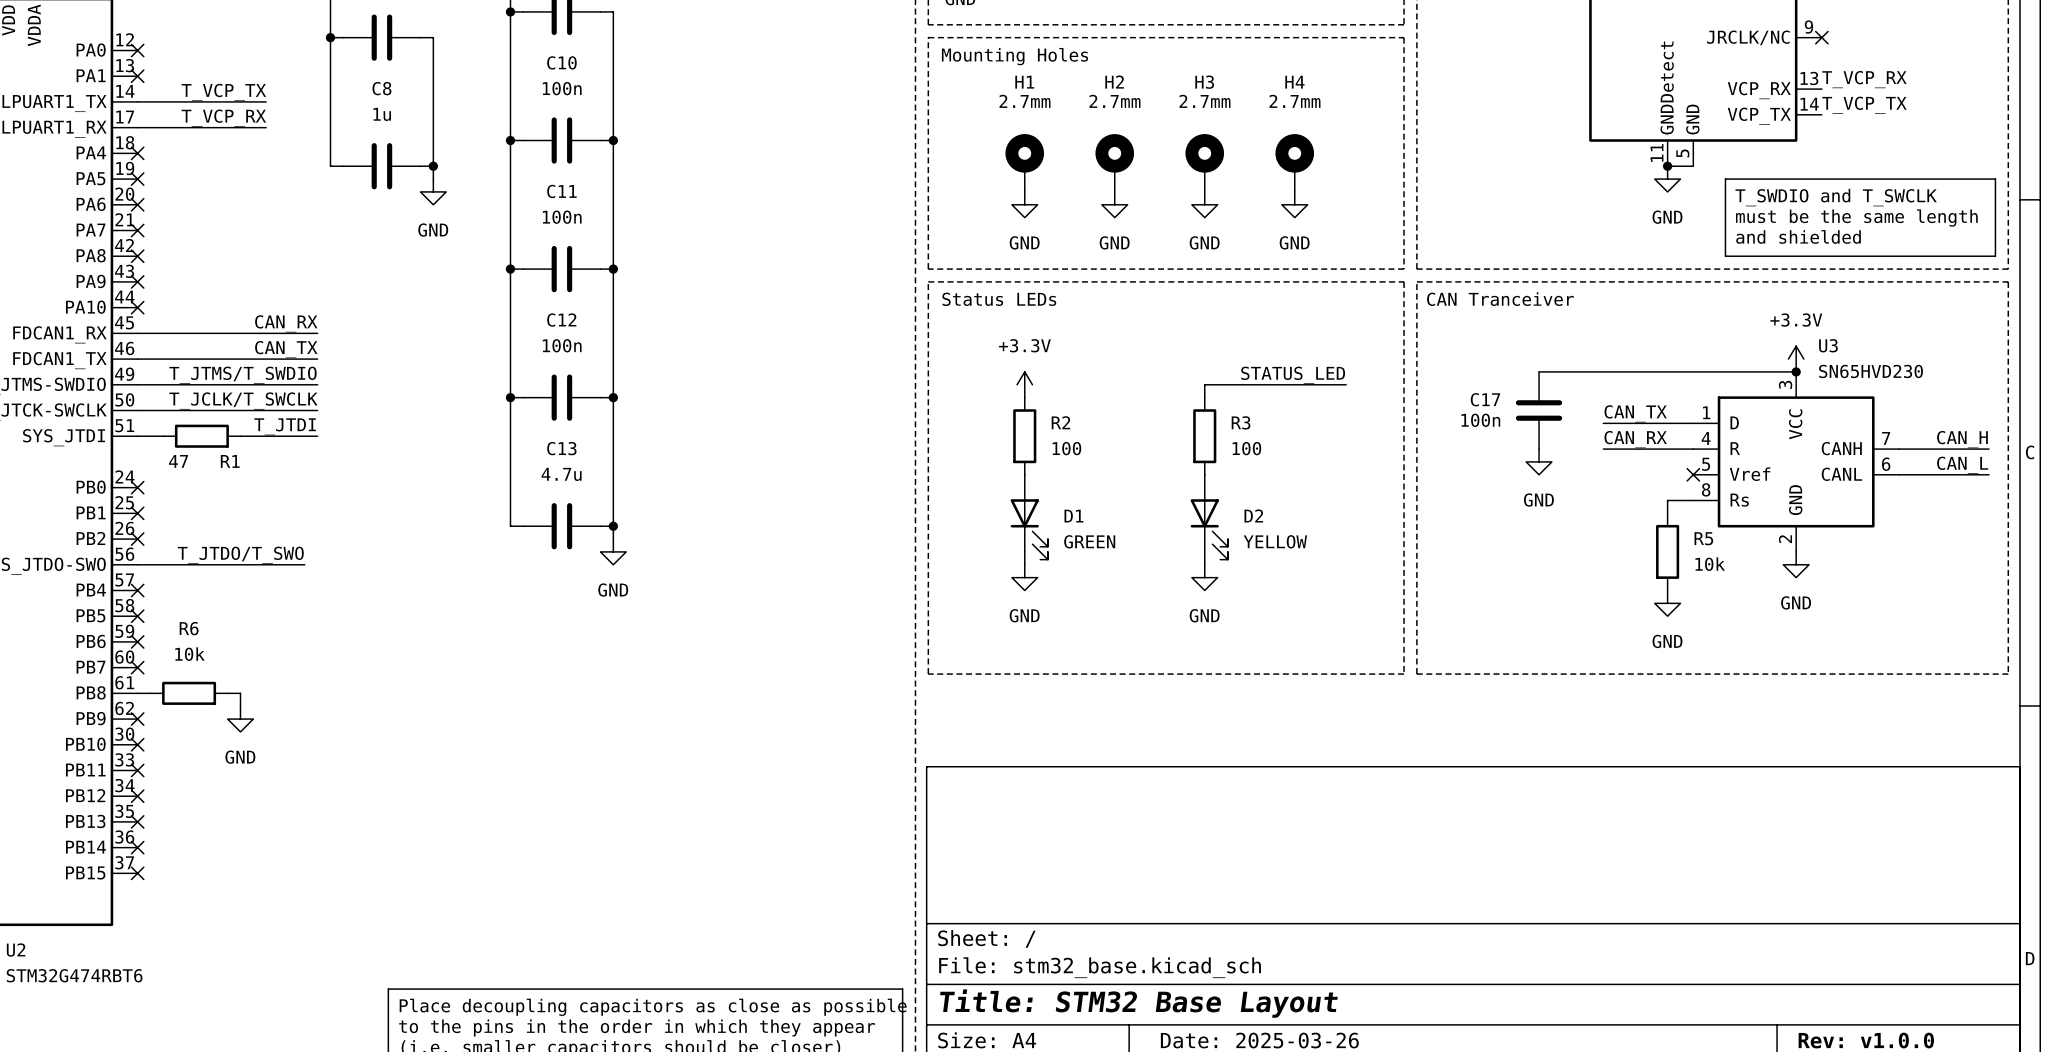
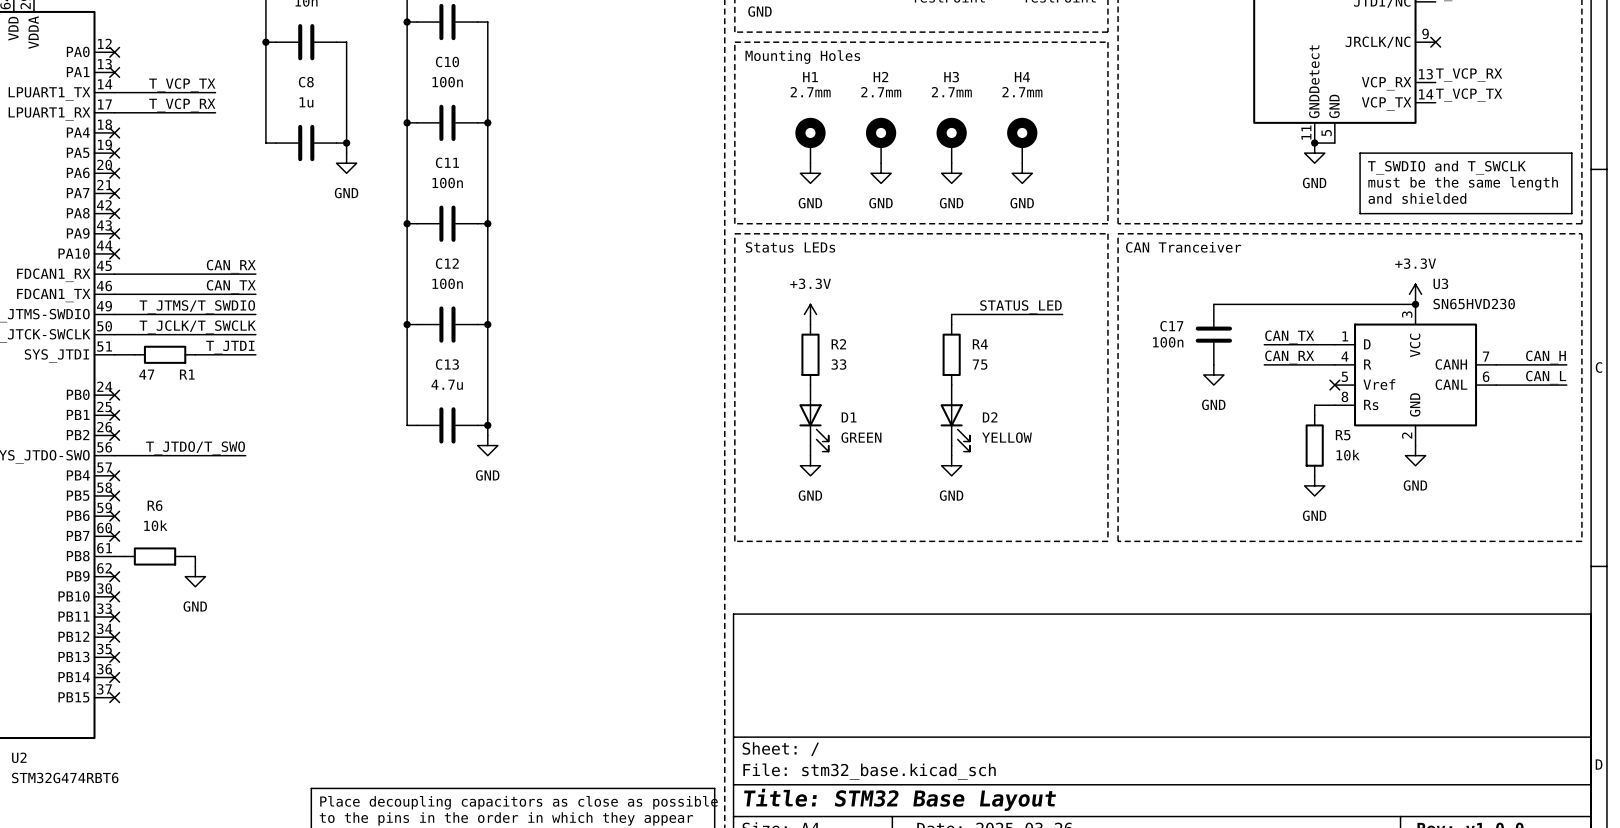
R3 name: R3 (1241, 422) -> R4 (980, 344)
R2 value: 100 (1066, 448) -> 33 (838, 364)
R3 value: 100 (1246, 448) -> 75 (980, 364)

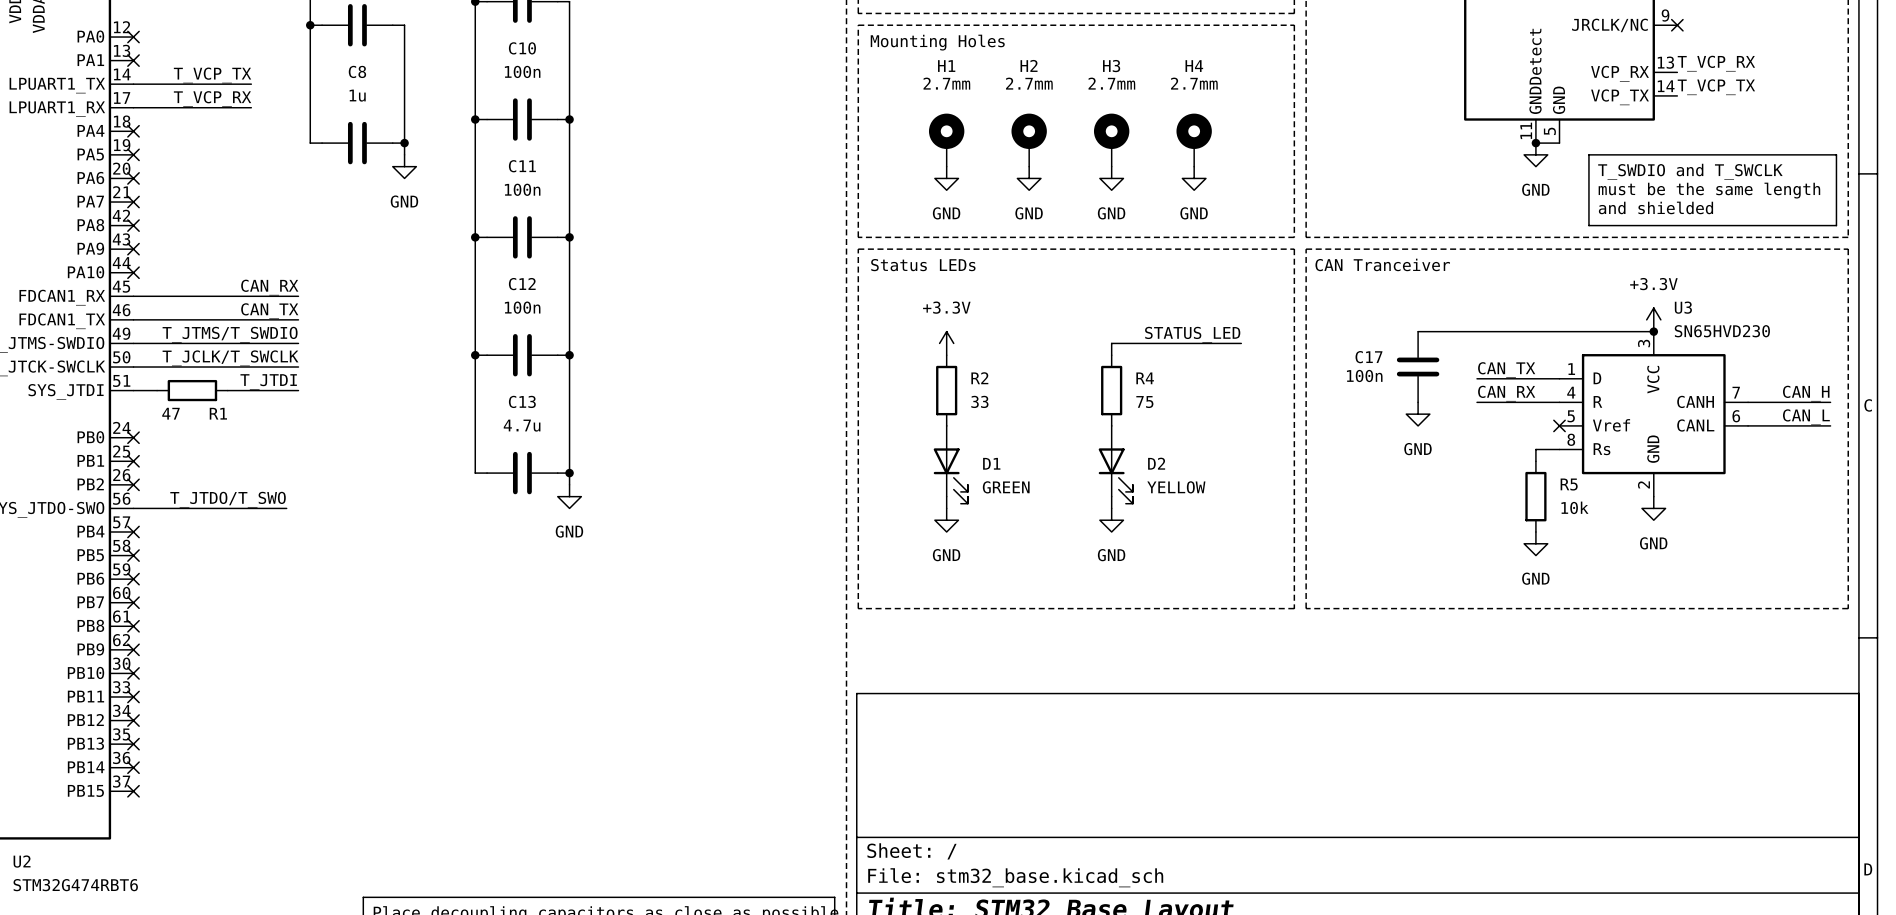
wire: (114, 556) (124, 556) -> none
no-connect mark: none -> (133, 626)
R6: 10k (155, 556) -> none
wire: (185, 556) (195, 556) (195, 566) -> none
power symbol: GND (195, 576) -> none

